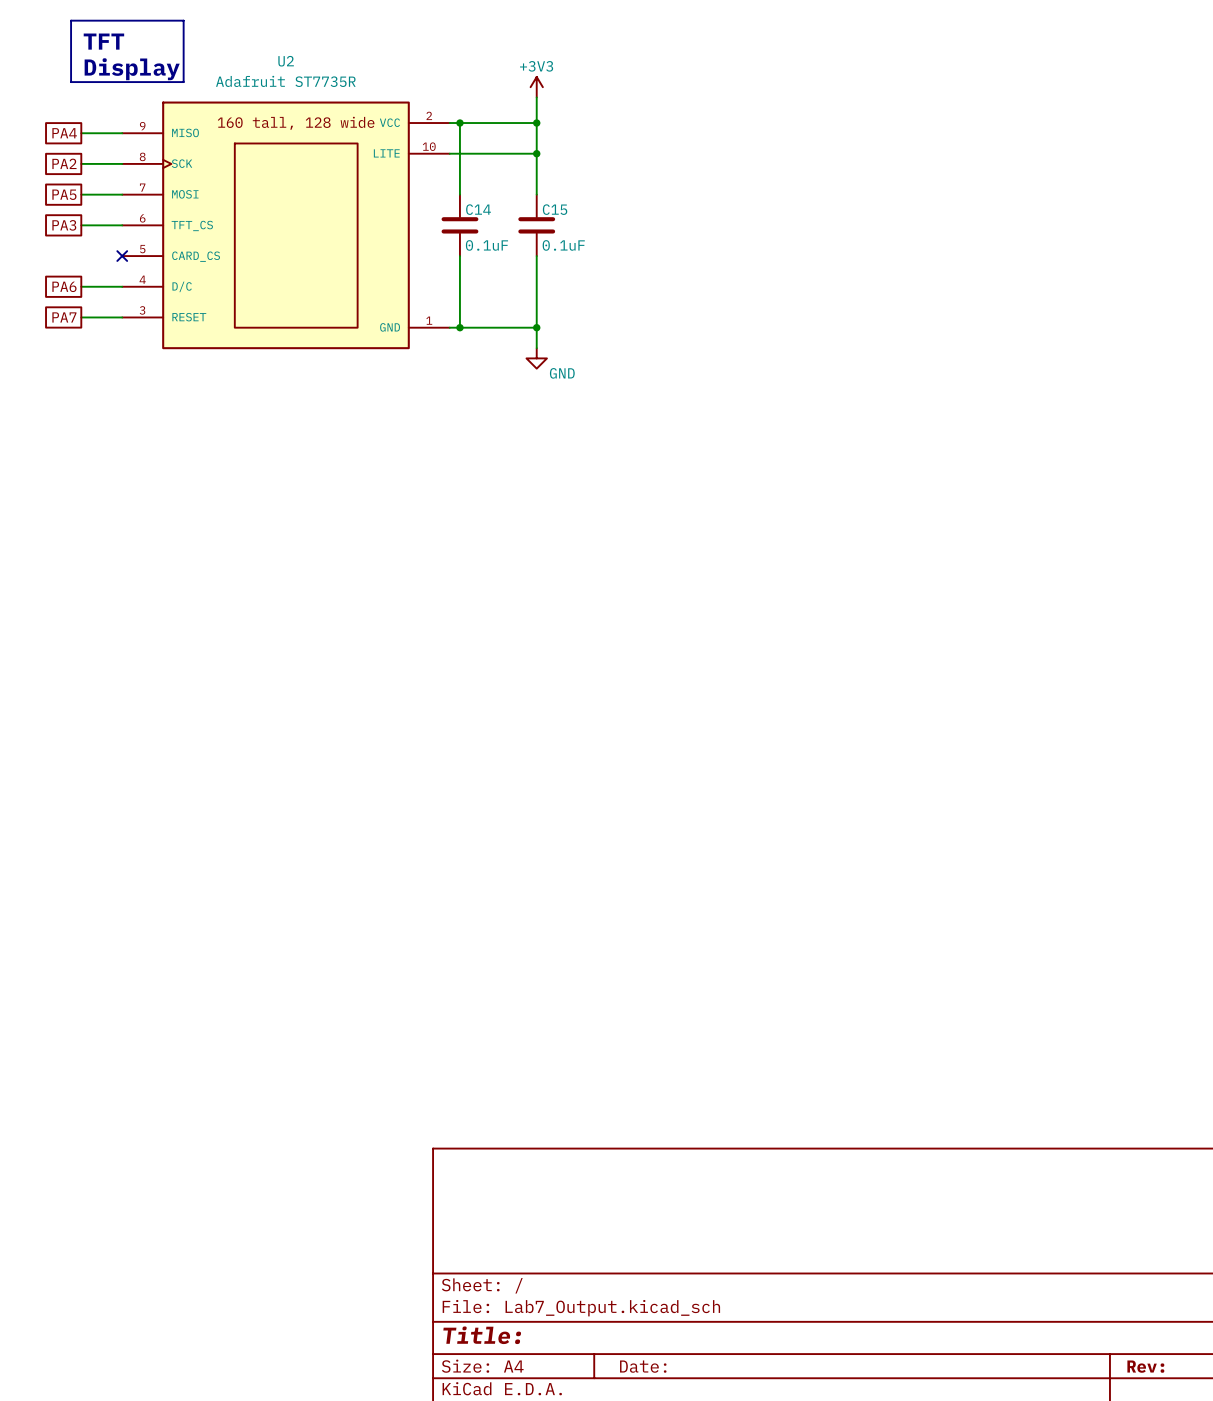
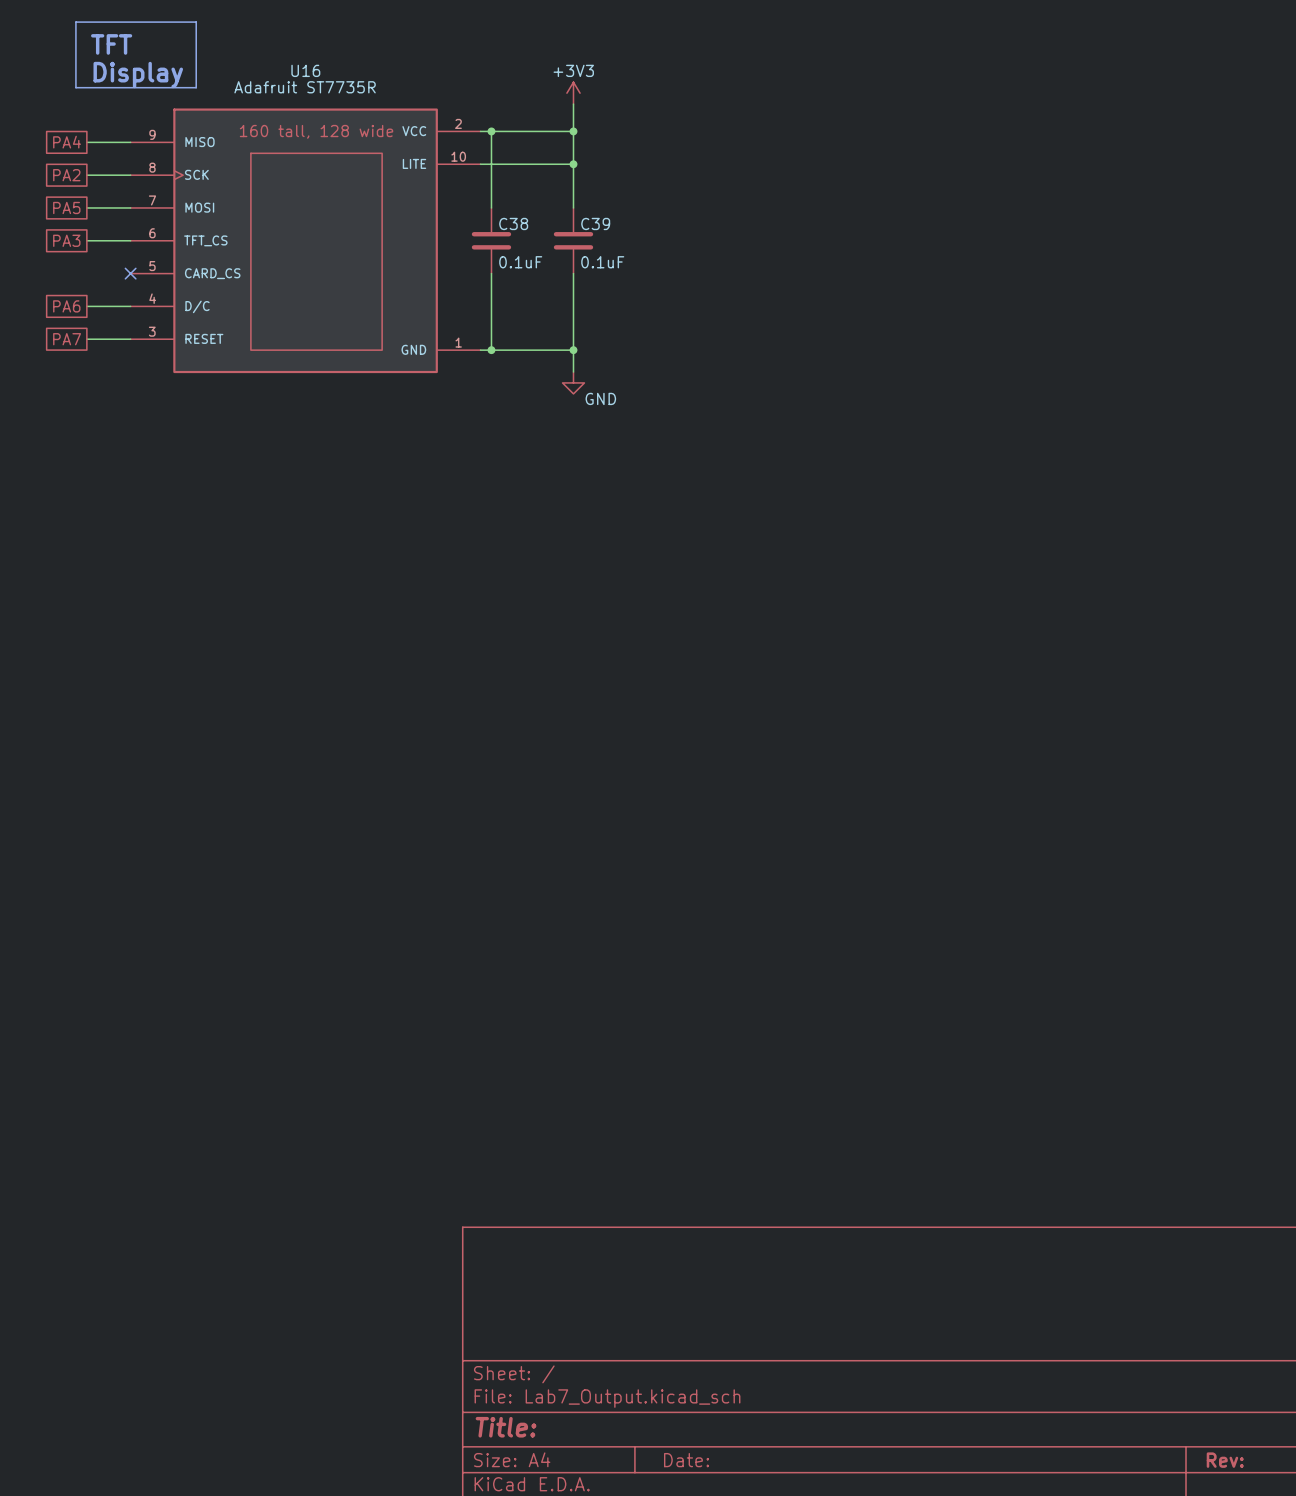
U2 name: U2 (286, 61) -> U16 (305, 70)
C14 name: C14 (478, 209) -> C38 (513, 223)
C15 name: C15 (555, 209) -> C39 (595, 223)

